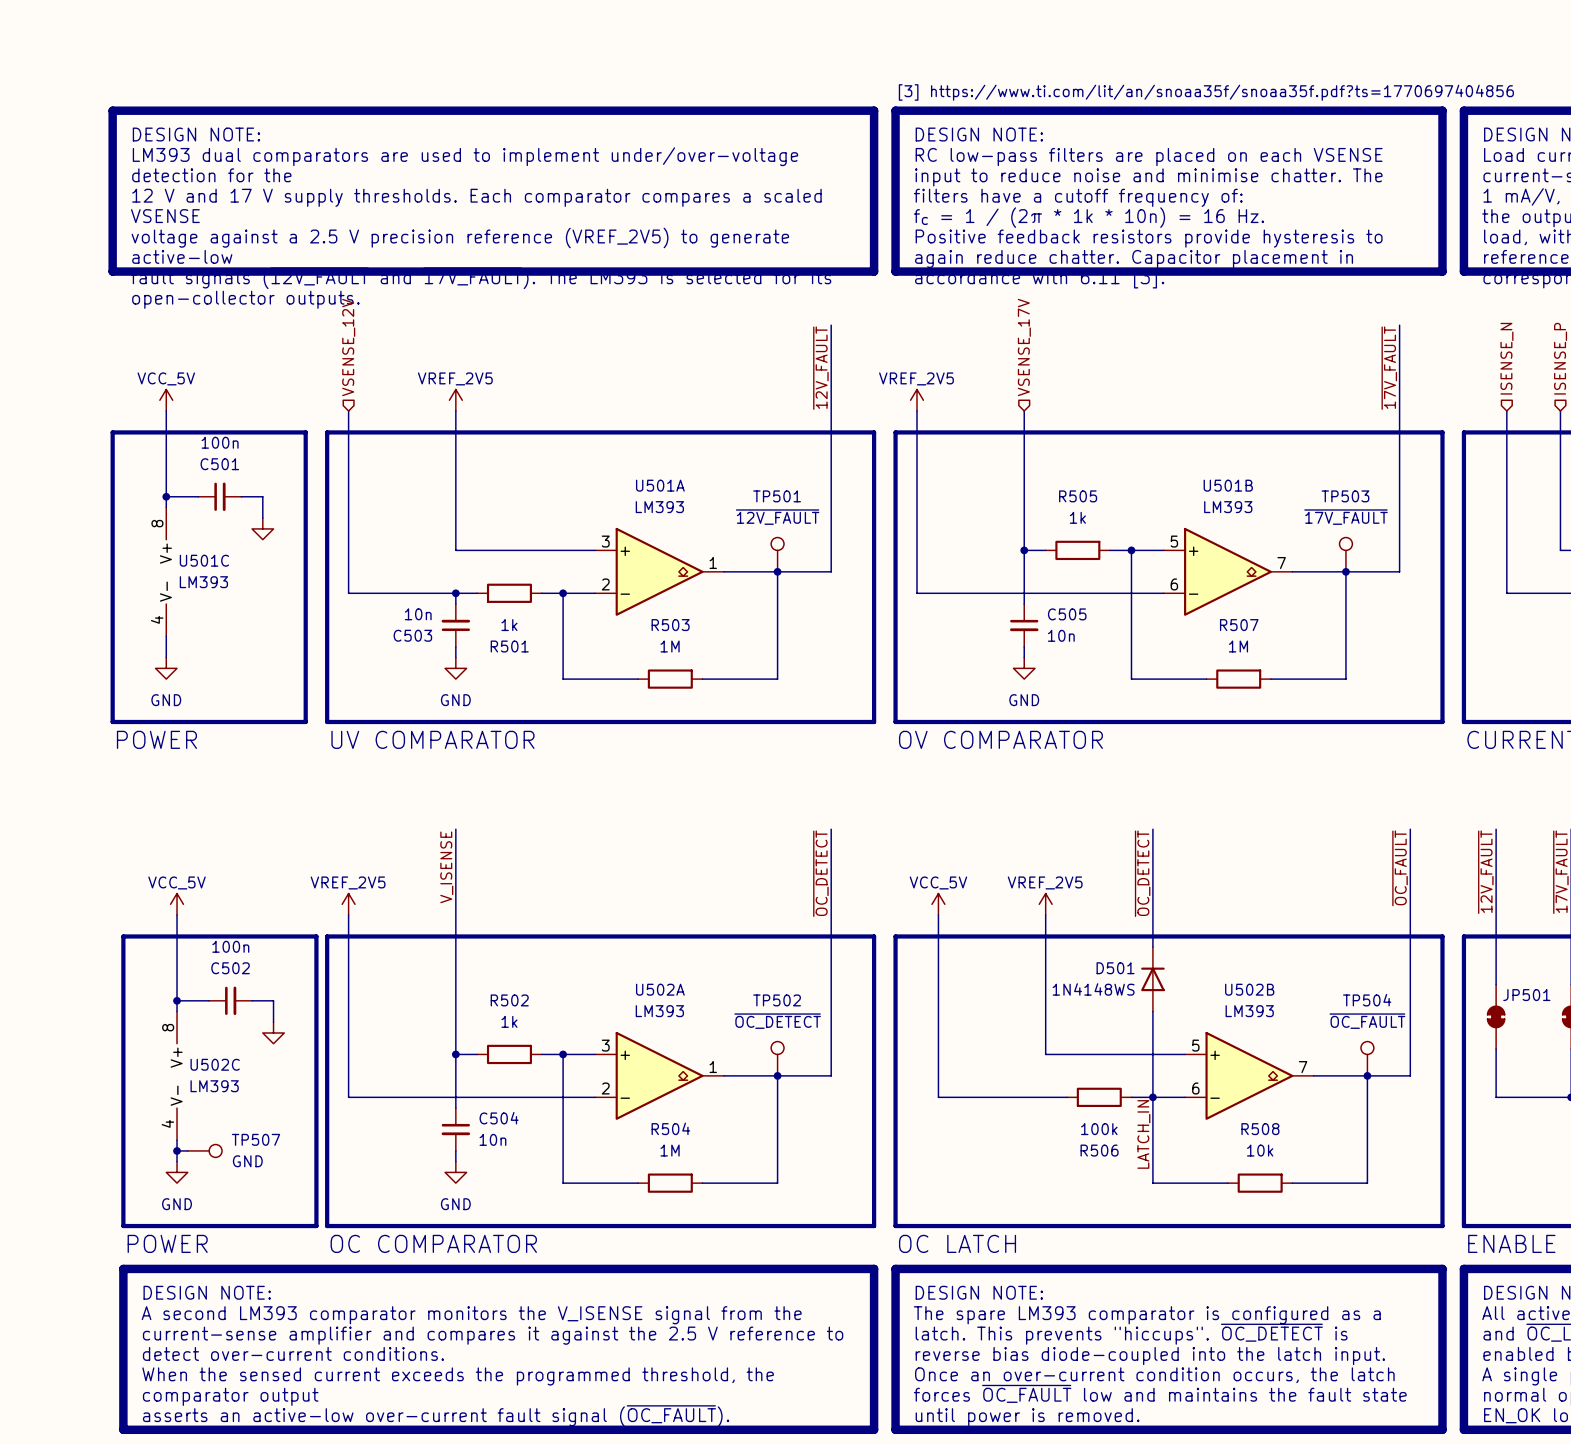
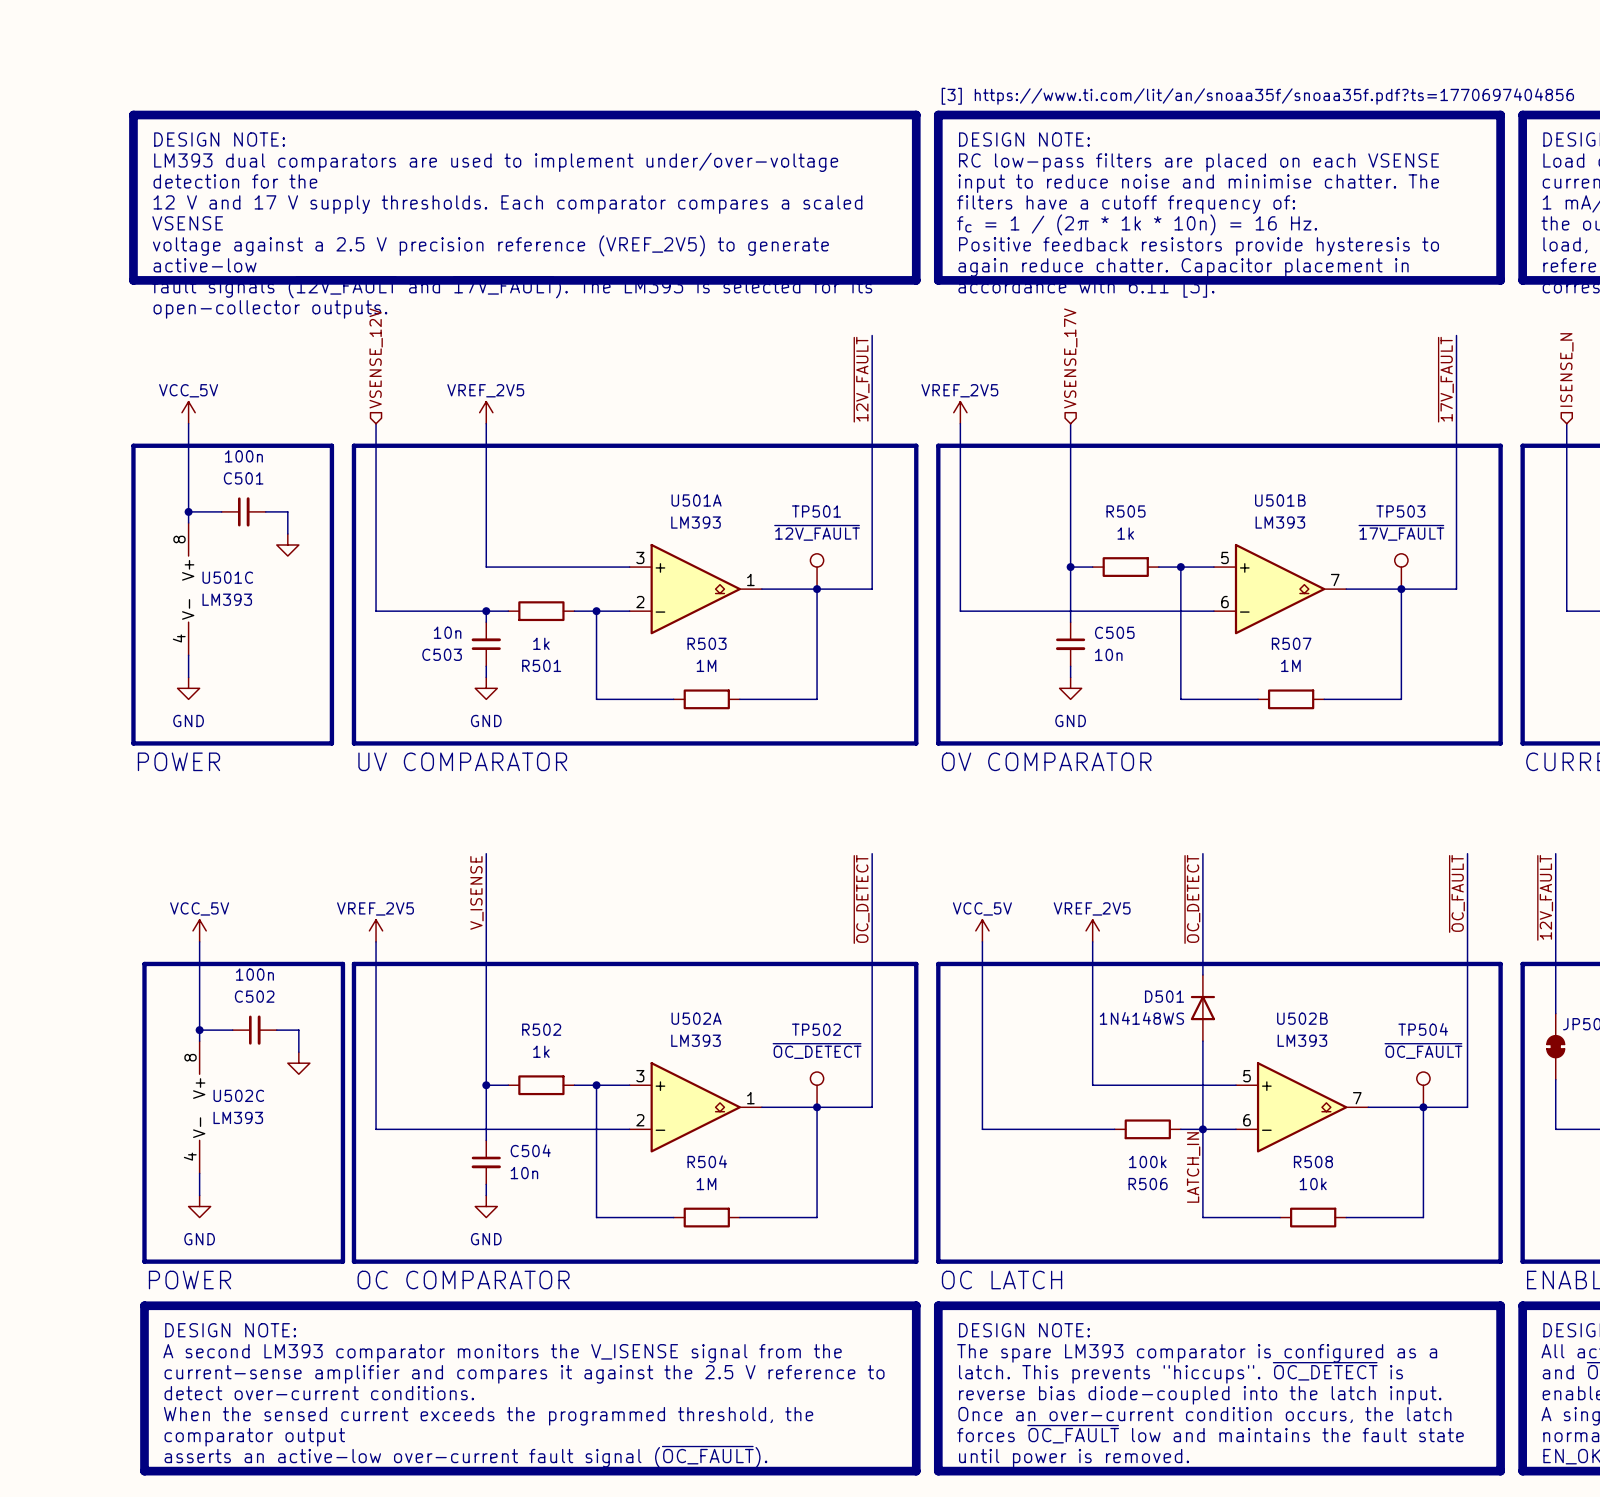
wire: (177, 1150) (187, 1150) -> none
junction: (177, 1150) -> none
TP507: GND (204, 1150) -> none

